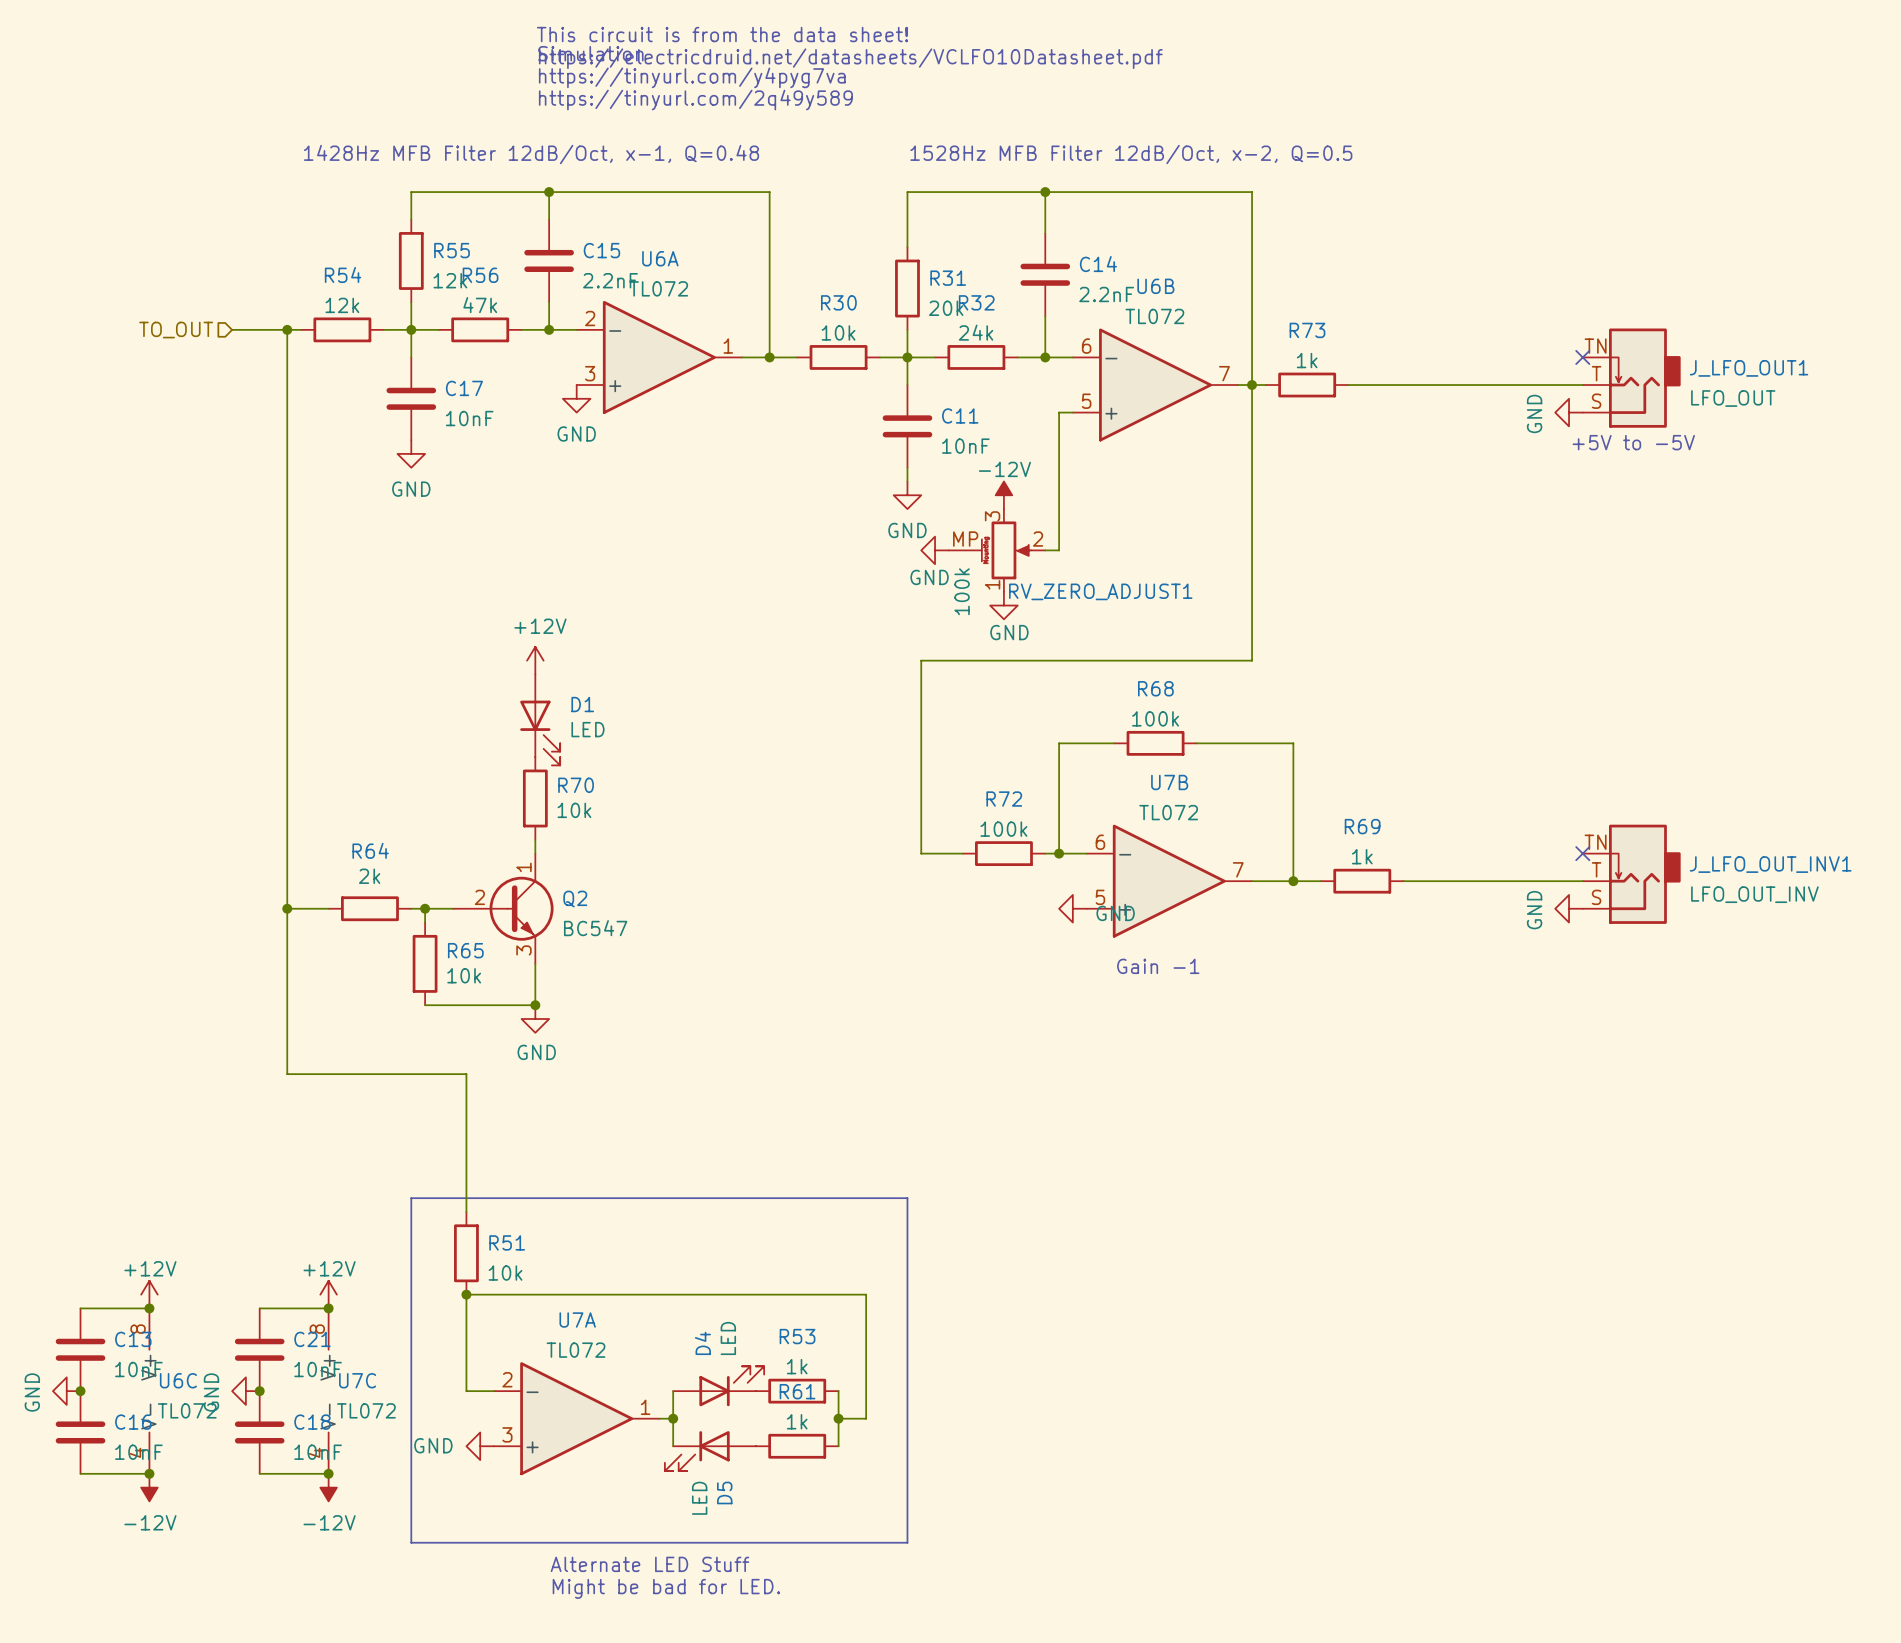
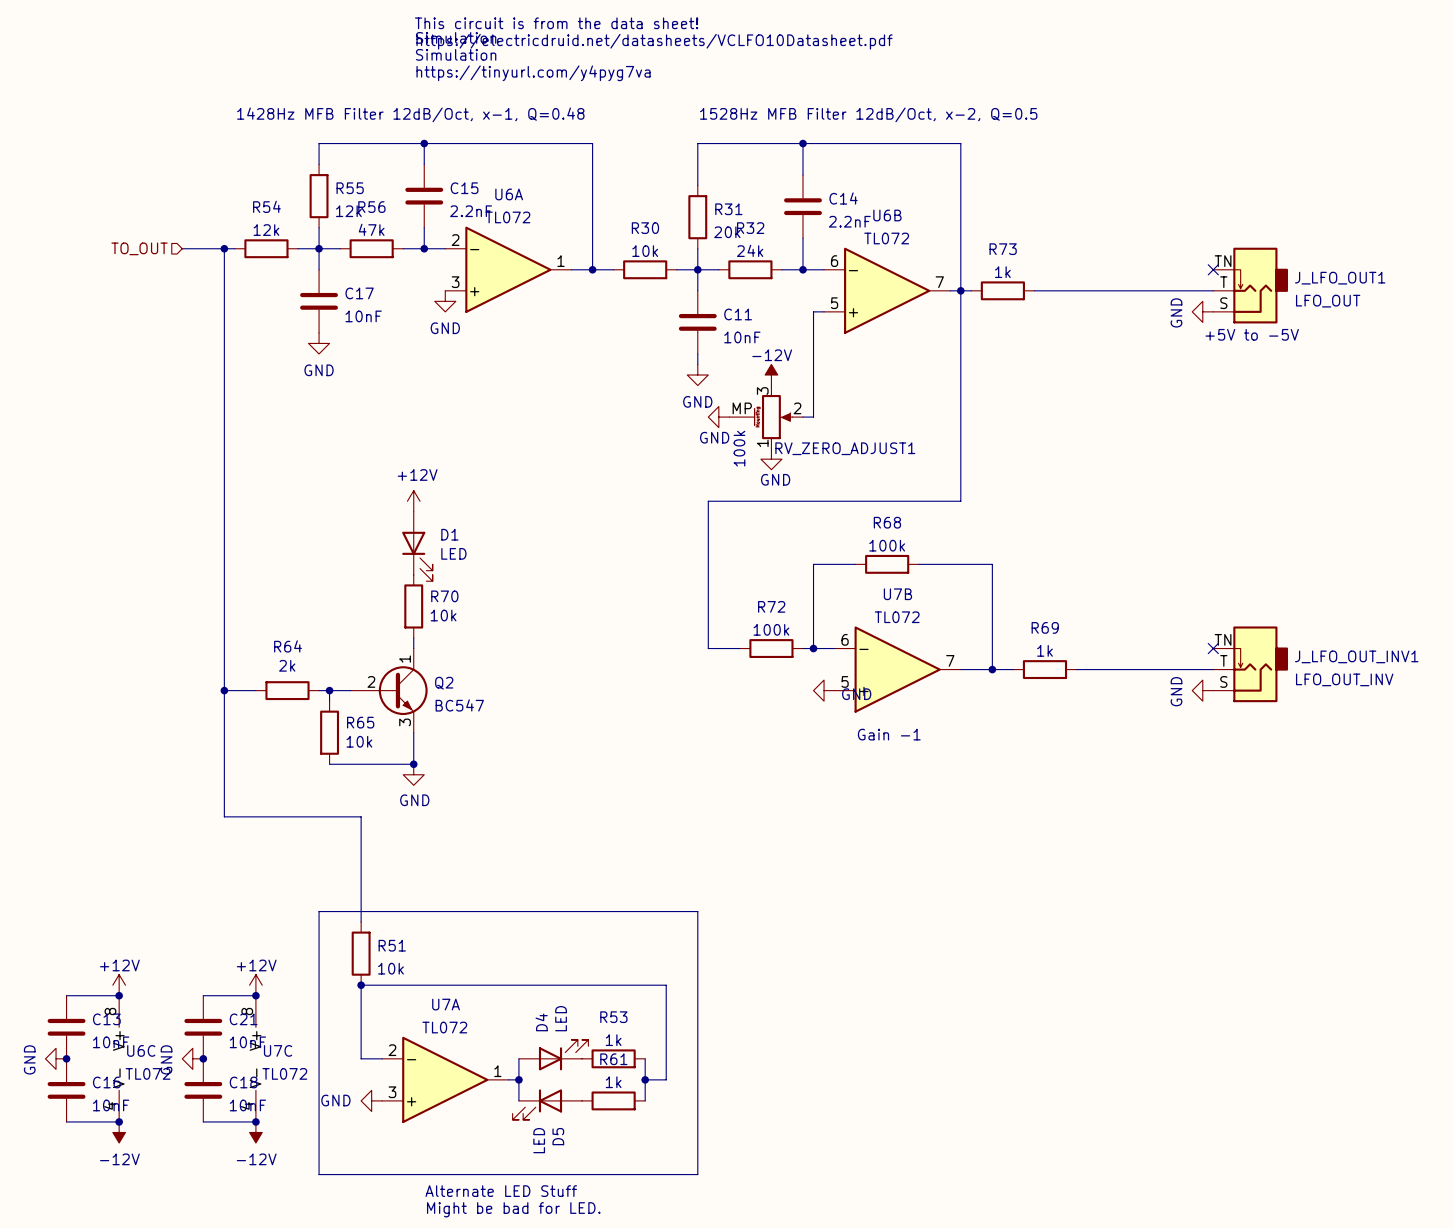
text: https://tinyurl.com/y4pyg7va (692, 77) -> Simulation (456, 54)
text: https://tinyurl.com/2q49y589 (695, 100) -> https://tinyurl.com/y4pyg7va (533, 73)

